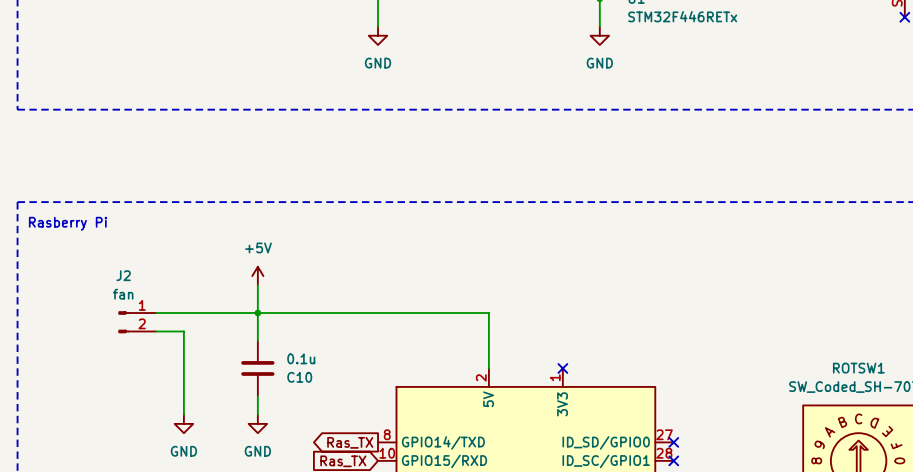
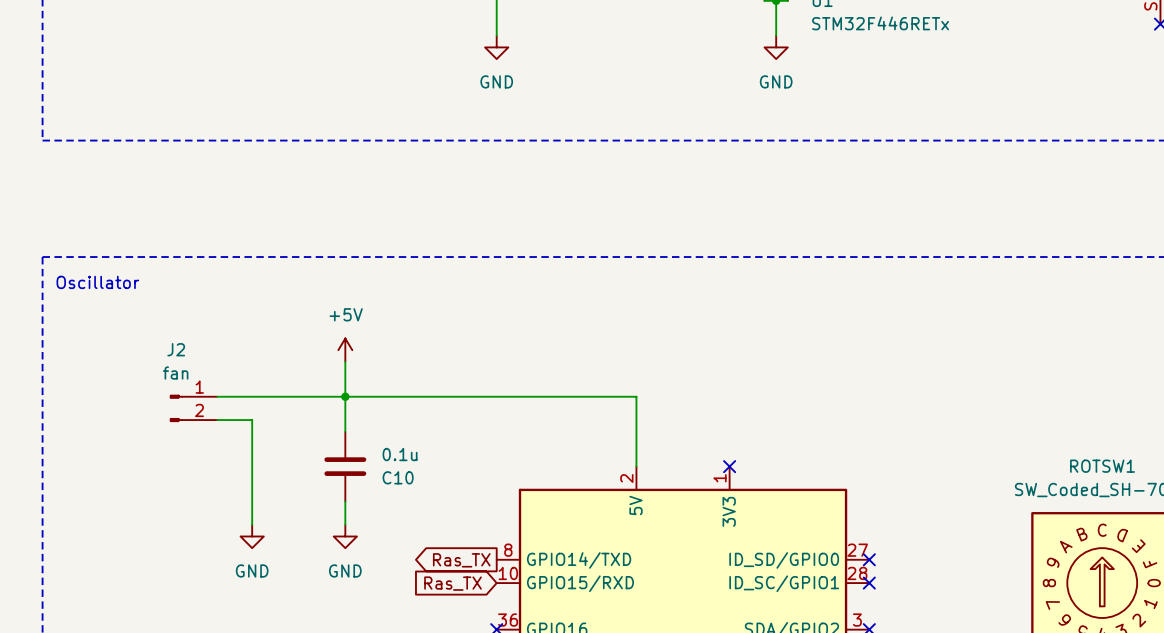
text: Rasberry Pi (68, 223) -> Oscillator (97, 282)

